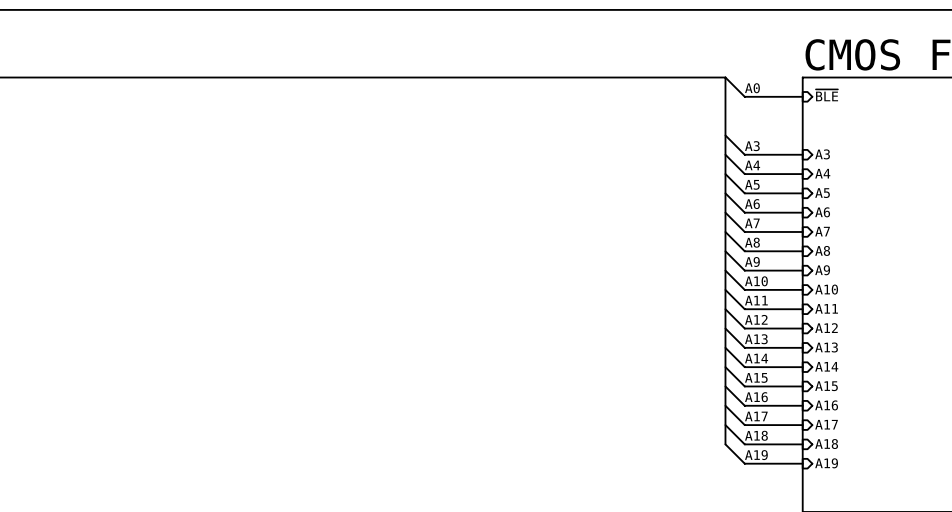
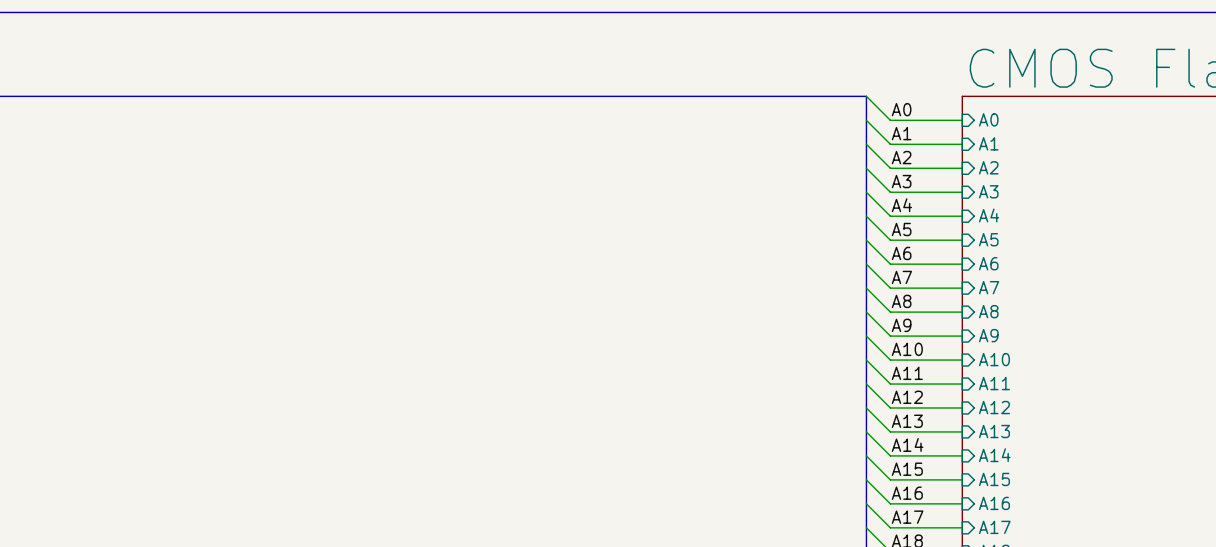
sheet pin: ~{BLE} (827, 95) -> A0 (988, 119)
wire: none -> (866, 120) (890, 144) (962, 144)
label: none -> A1 (901, 133)
sheet pin: none -> A1 (988, 143)
wire: none -> (866, 144) (890, 168) (962, 168)
label: none -> A2 (901, 157)
sheet pin: none -> A2 (988, 167)

